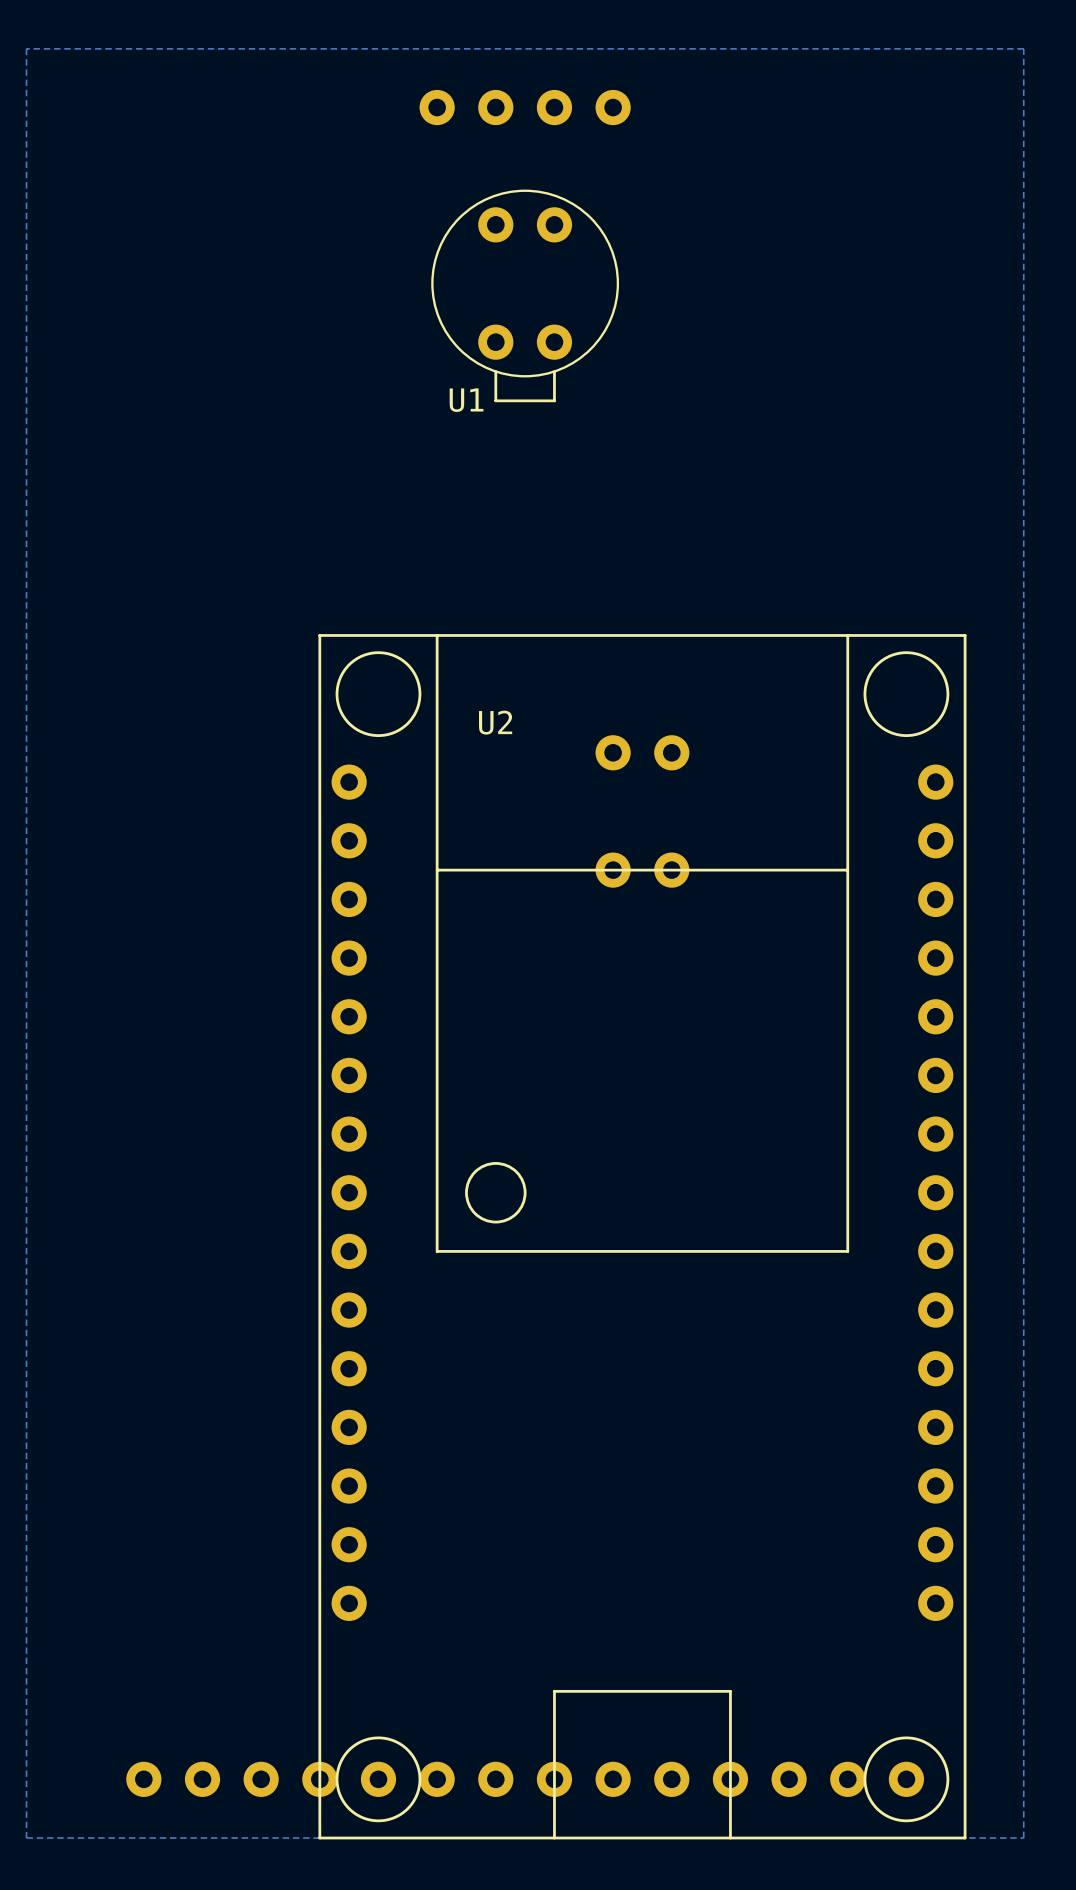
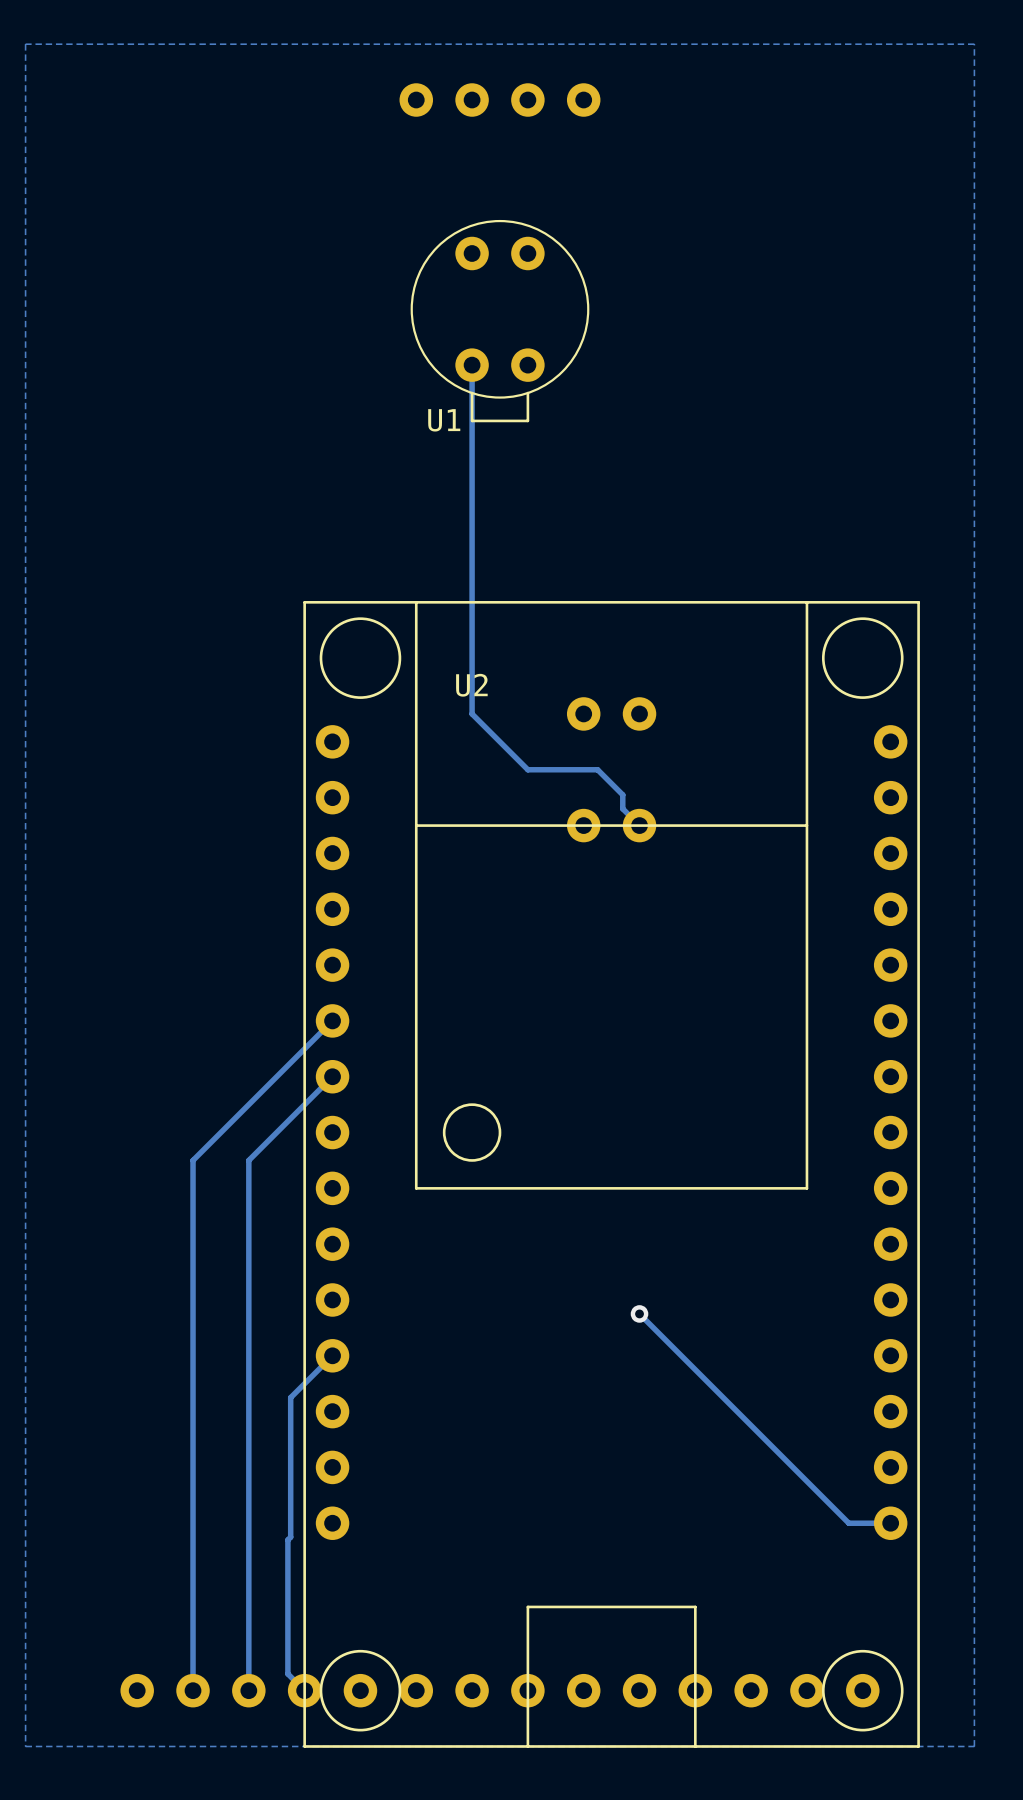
U1 position: (525, 295) -> (499, 321)
track: none -> (472, 365) (472, 713) (527, 769) (597, 769) (622, 794) (622, 808) (639, 825)
track: none -> (332, 1020) (193, 1160) (193, 1690)
track: none -> (332, 1076) (248, 1160) (248, 1690)
track: none -> (639, 1313) (848, 1523) (890, 1523)
via: none -> (639, 1313)
track: none -> (332, 1355) (290, 1397) (287, 1673) (304, 1690)

